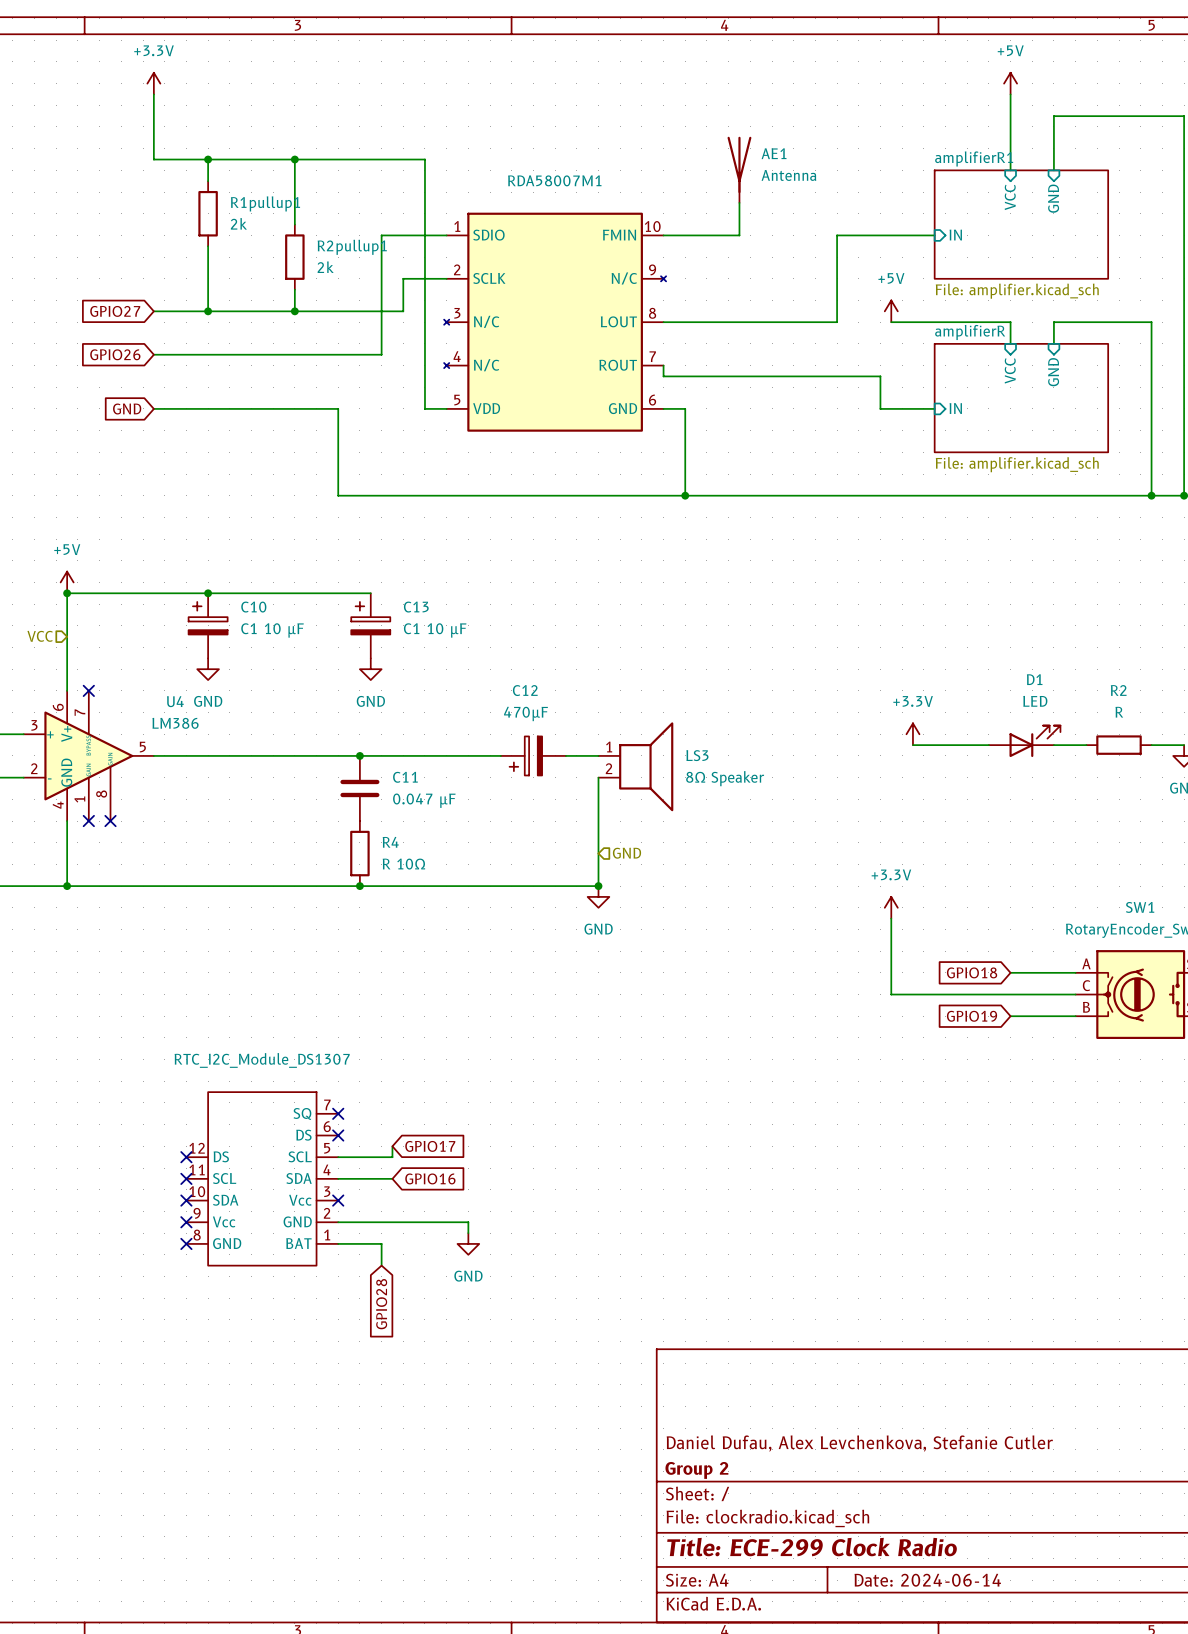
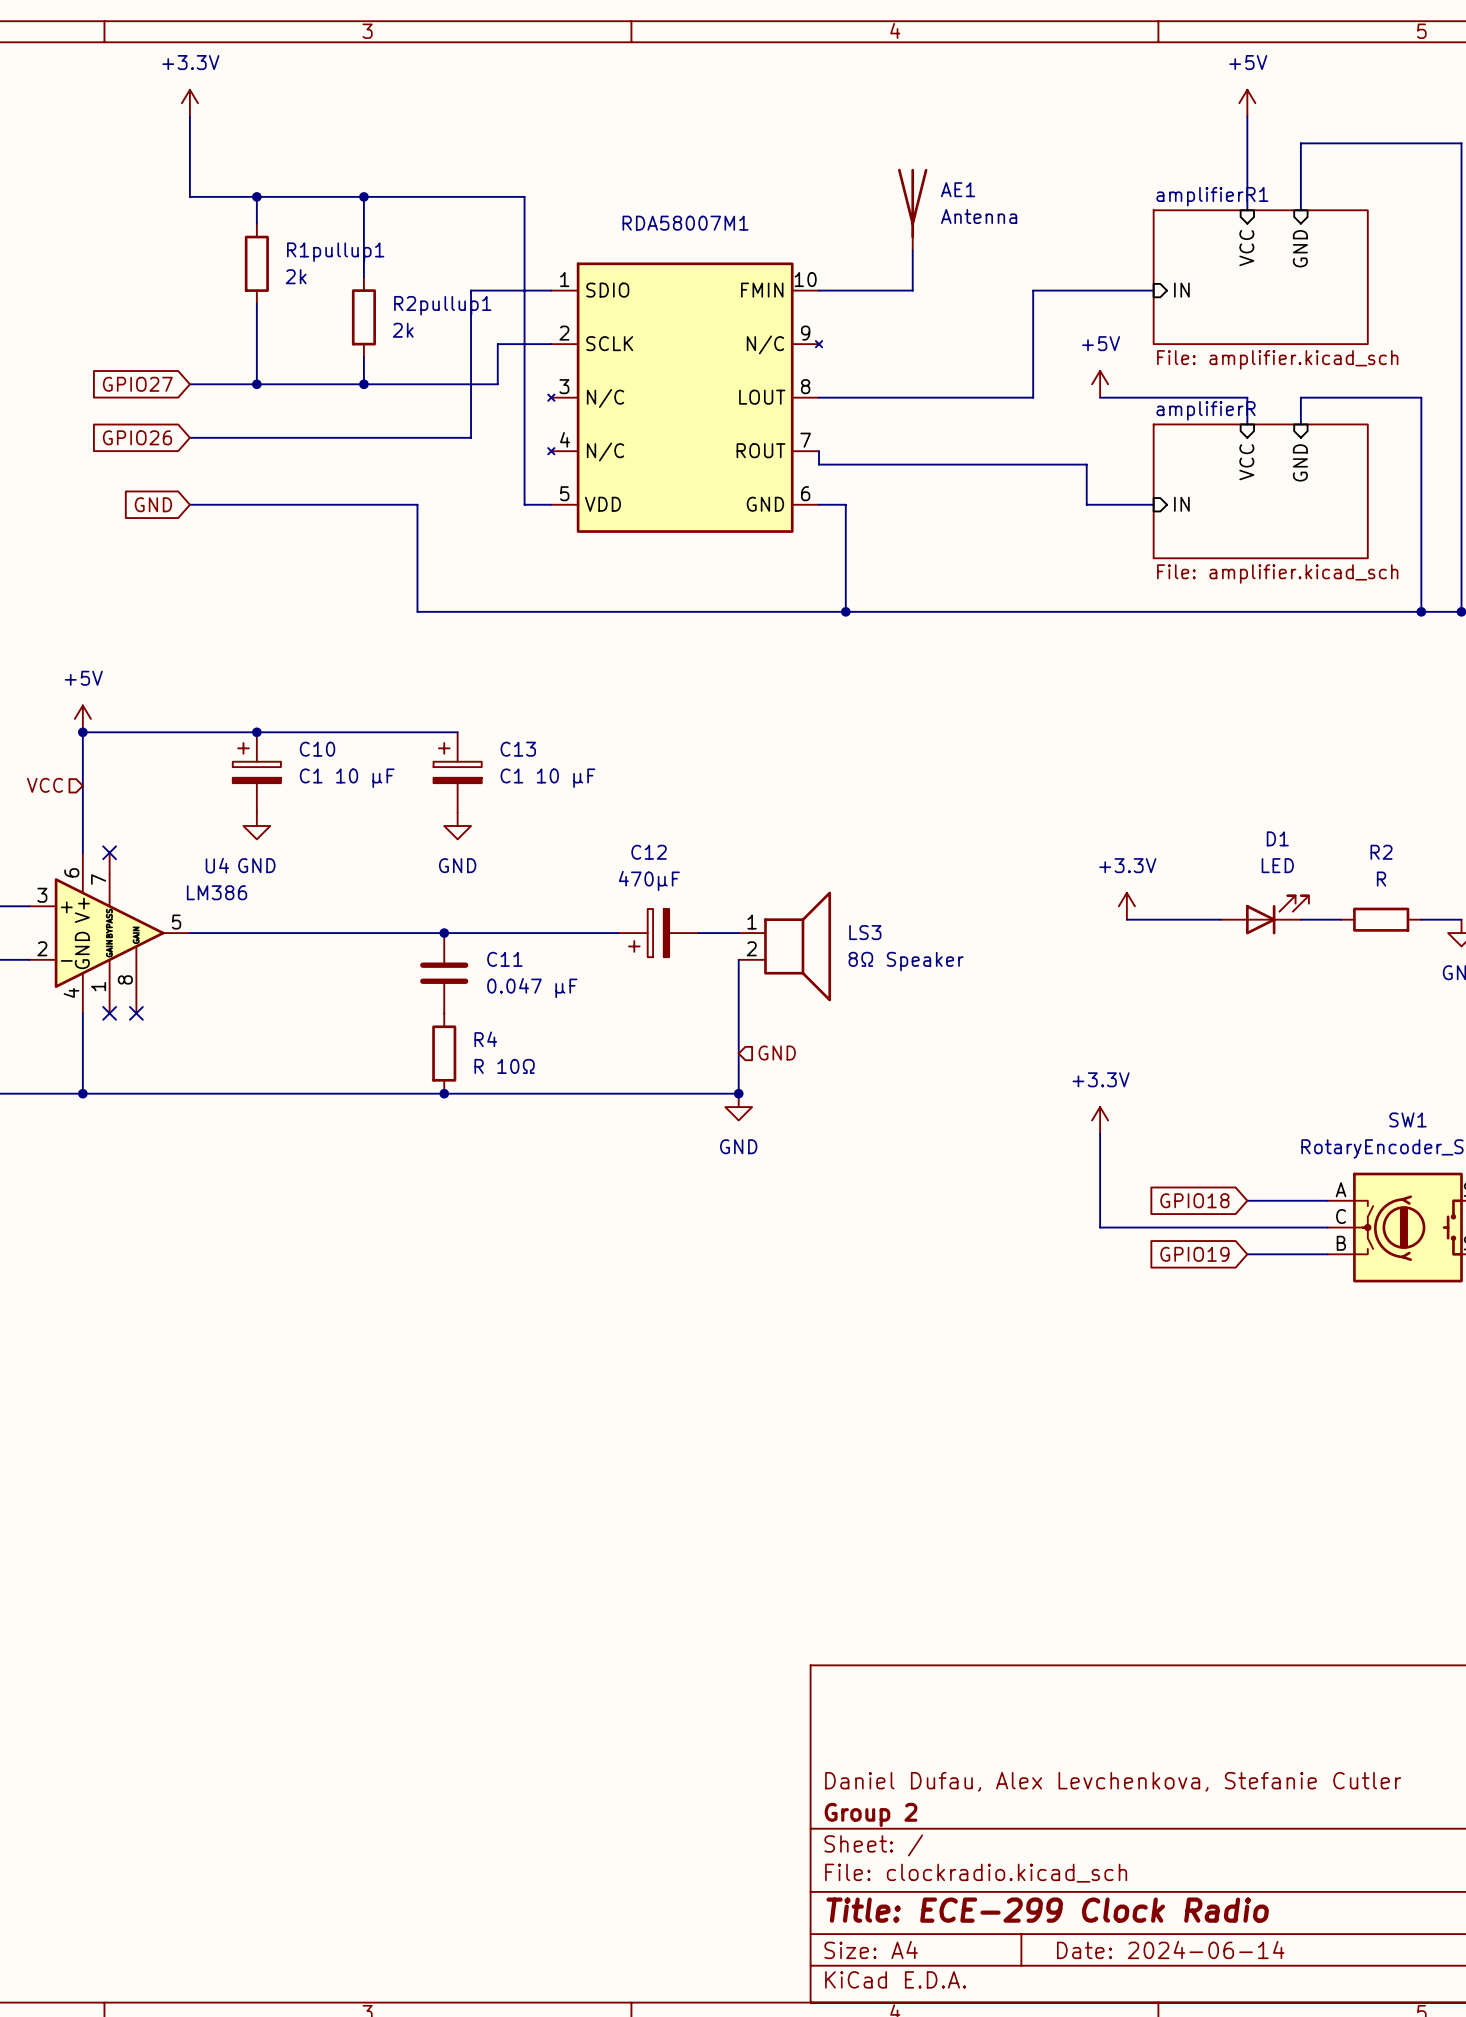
no-connect mark: (338, 1113) -> none
no-connect mark: (338, 1135) -> none
wire: (392, 1146) (392, 1157) (338, 1157) -> none
global label: GPIO17 (430, 1146) -> none
no-connect mark: (186, 1157) -> none
no-connect mark: (186, 1178) -> none
RTC_I2C_Module_DS1307: (262, 1178) -> none
wire: (338, 1178) (392, 1178) -> none
global label: GPIO16 (430, 1178) -> none
no-connect mark: (186, 1200) -> none
no-connect mark: (338, 1200) -> none
no-connect mark: (186, 1222) -> none
wire: (338, 1222) (468, 1222) (468, 1233) -> none
no-connect mark: (186, 1243) -> none
wire: (338, 1243) (381, 1243) (381, 1265) -> none
power symbol: GND (468, 1243) -> none
global label: GPIO28 (381, 1304) -> none

